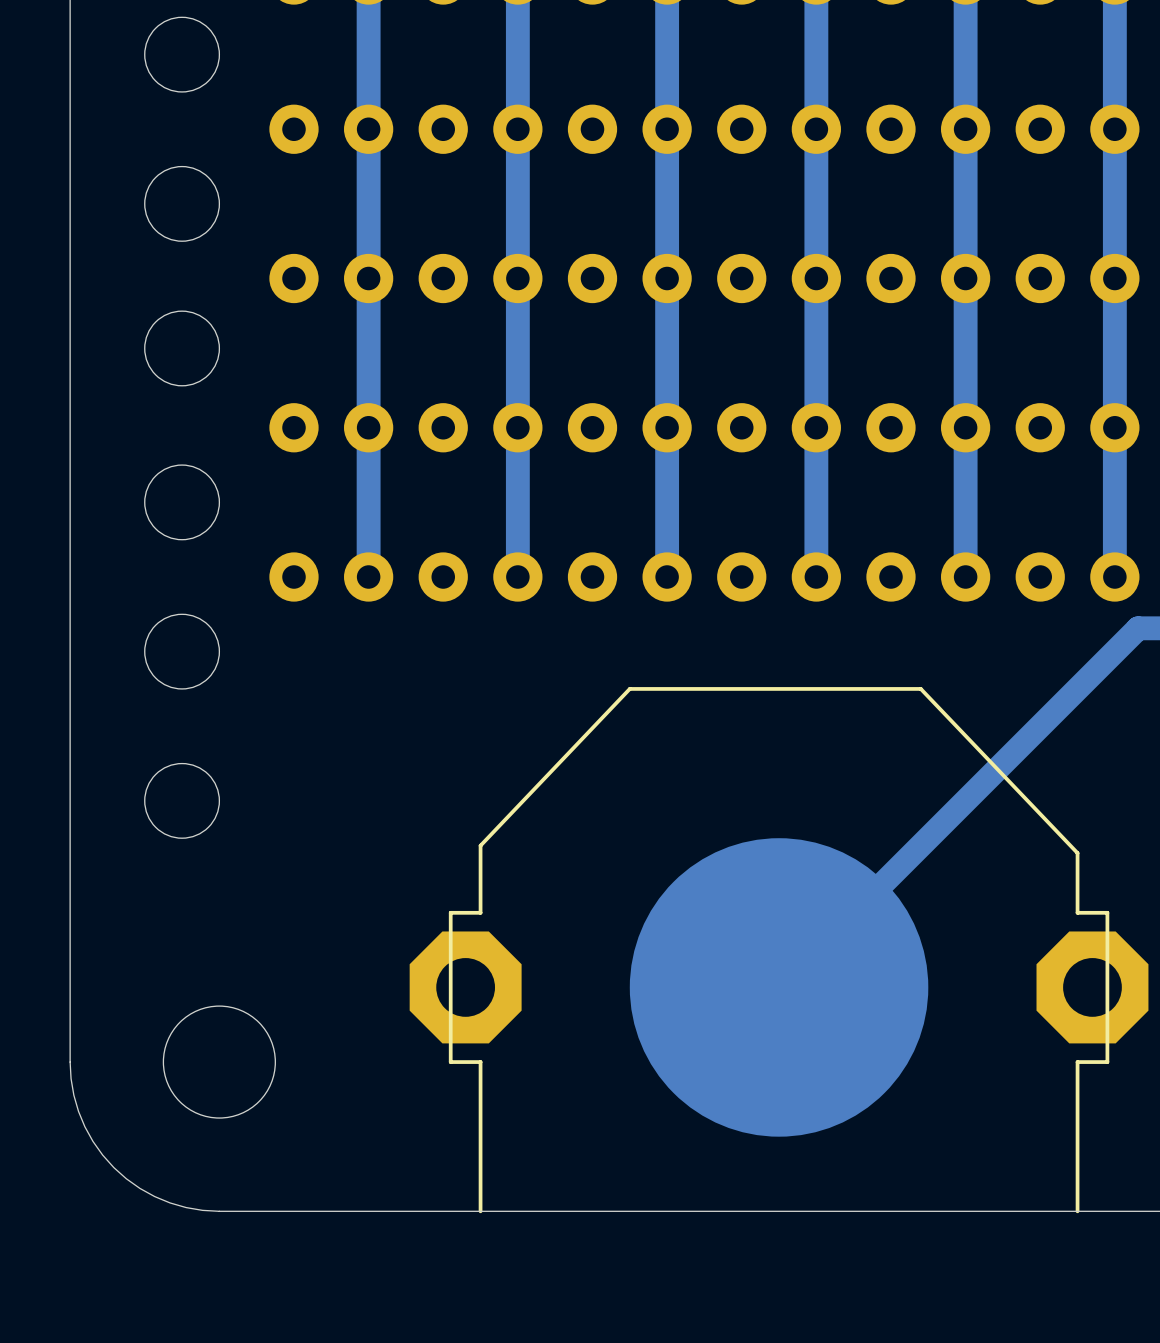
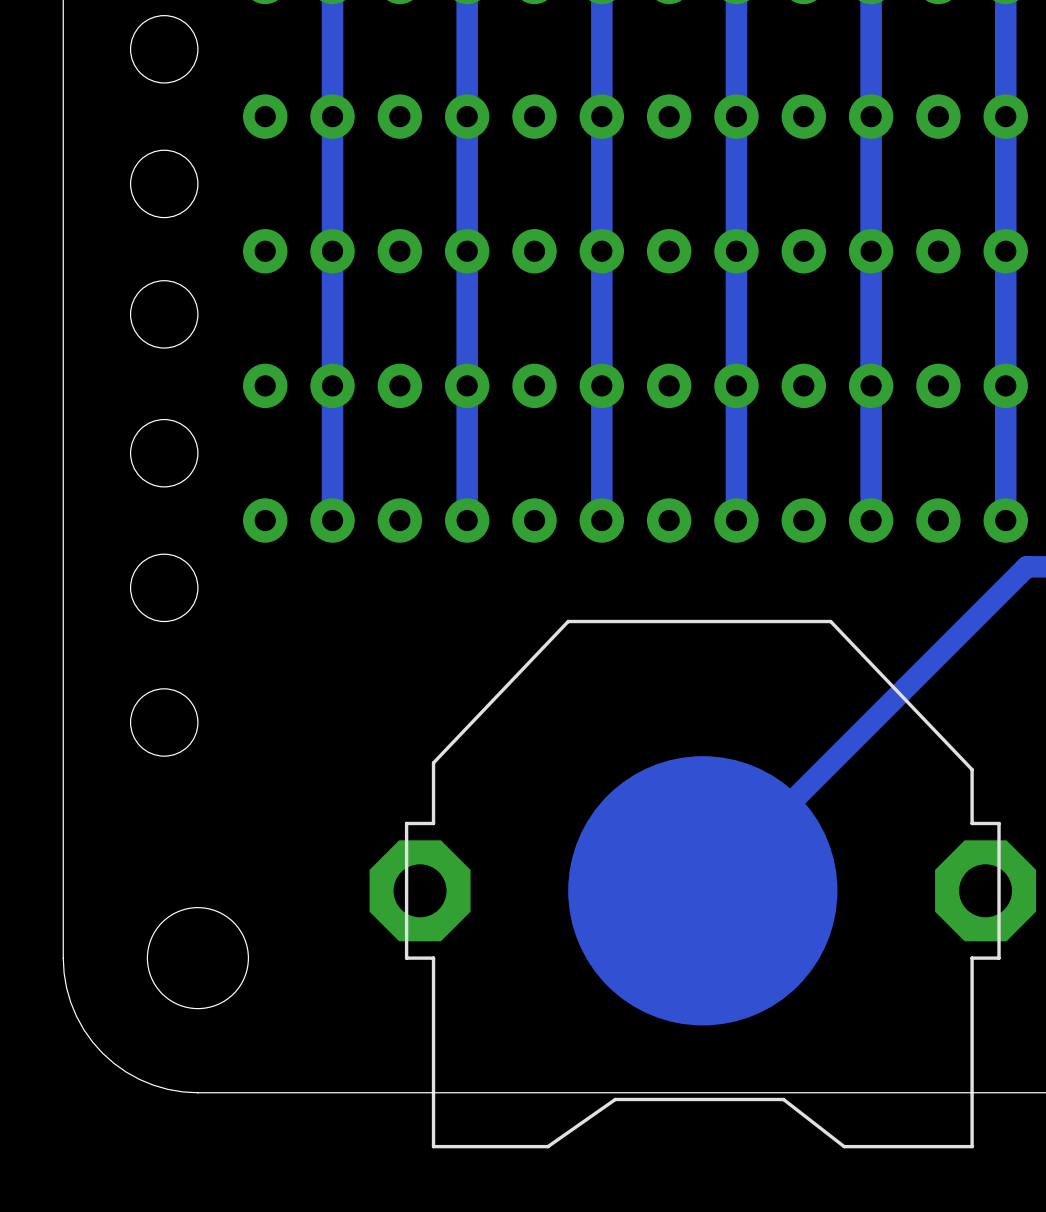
part: (779, 950) -> none
part: none -> (702, 884)

